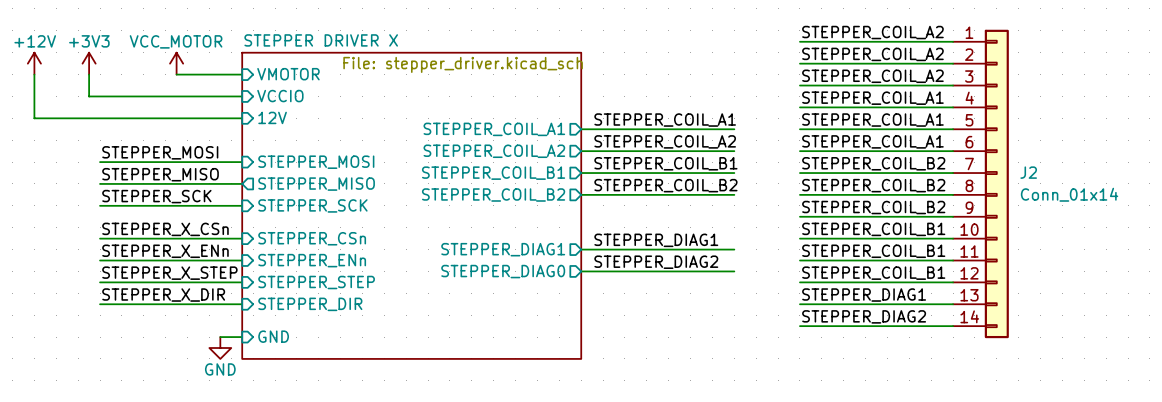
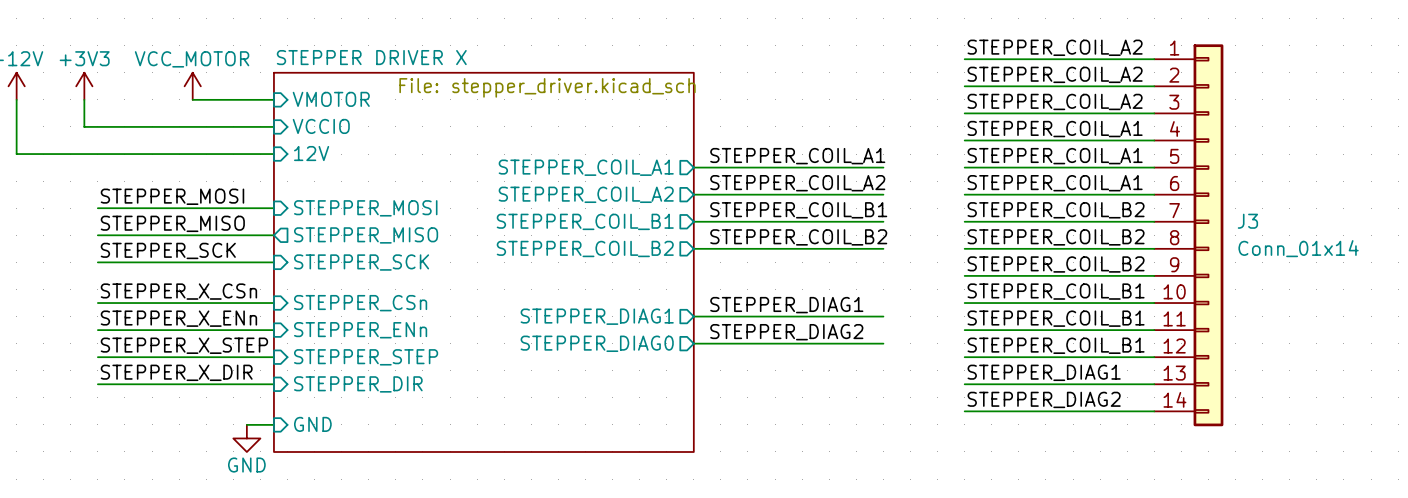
J2 name: J2 (1028, 172) -> J3 (1247, 221)

